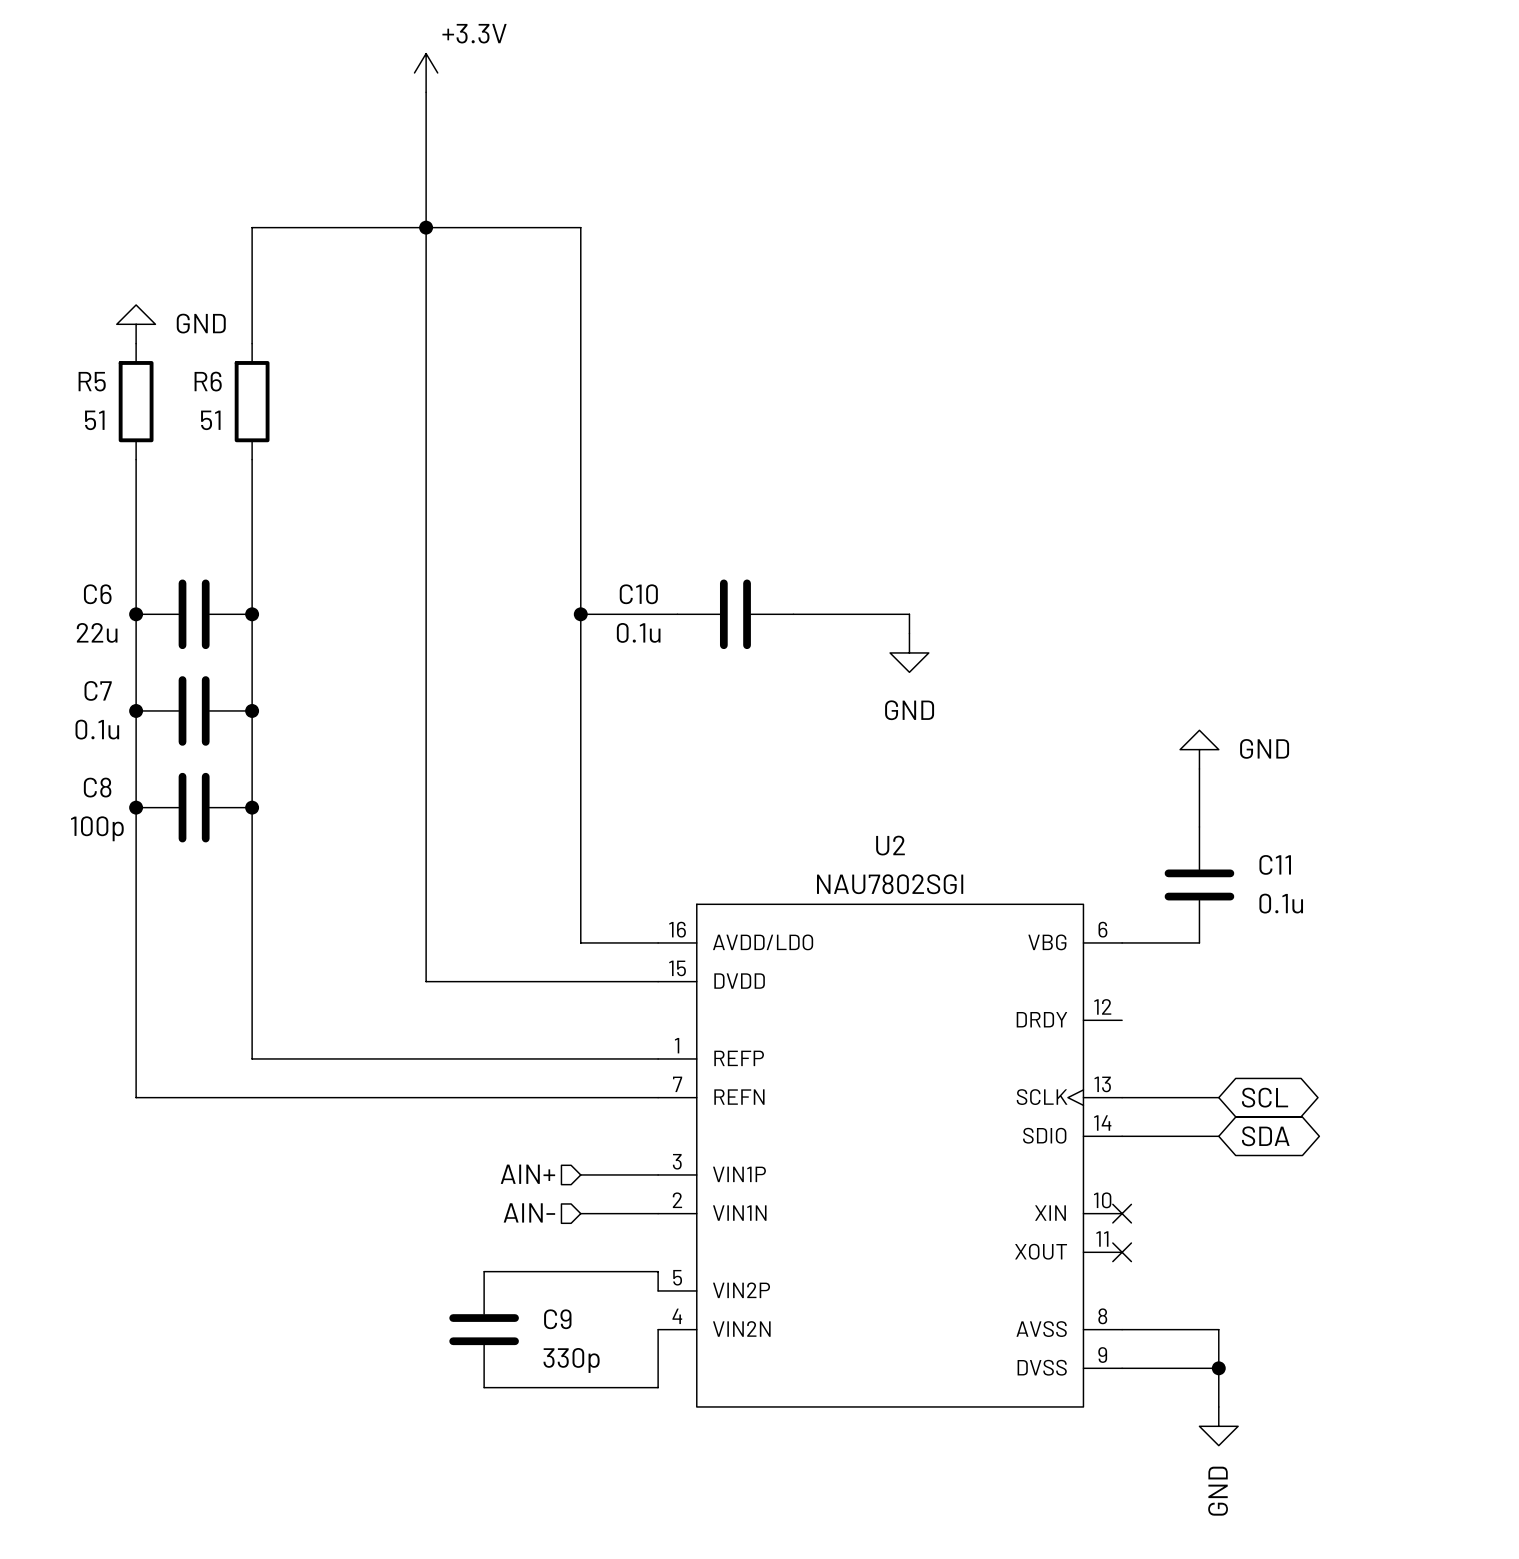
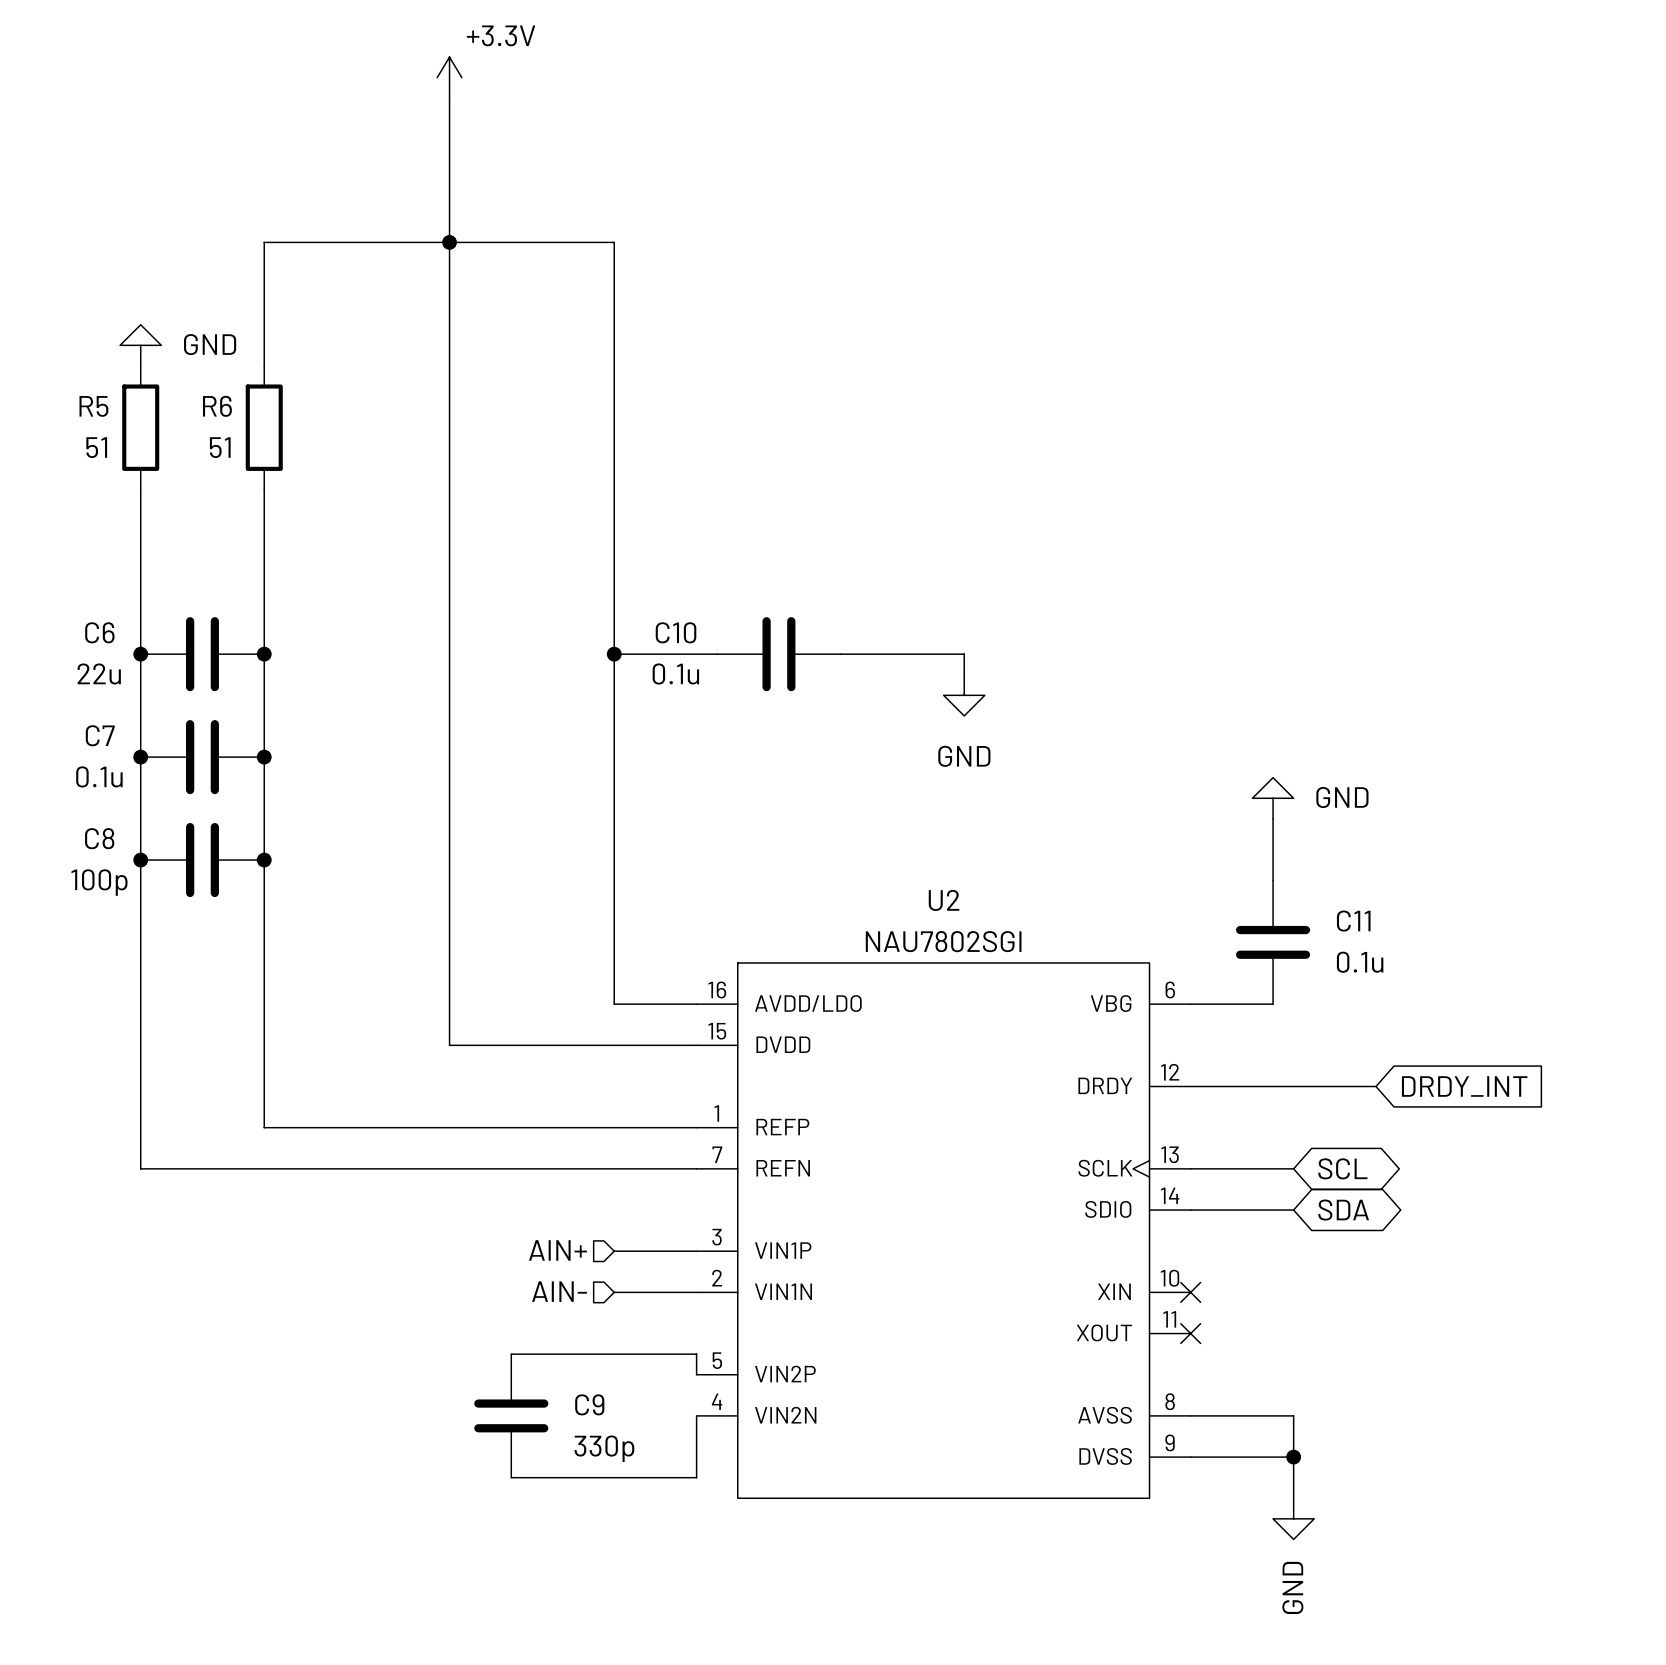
wire: none -> (1190, 1086) (1375, 1086)
global label: none -> DRDY_INT (1464, 1086)

